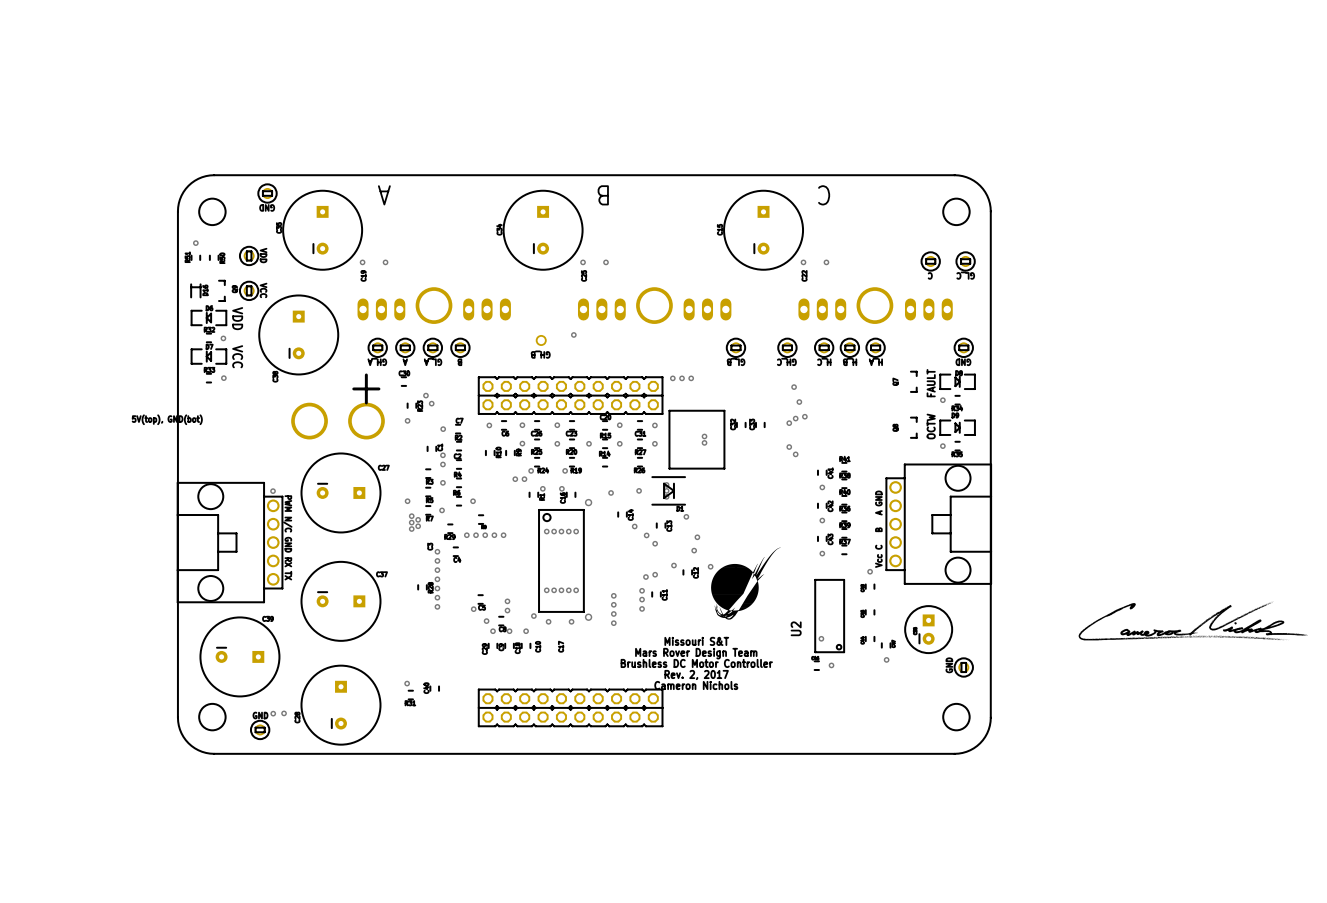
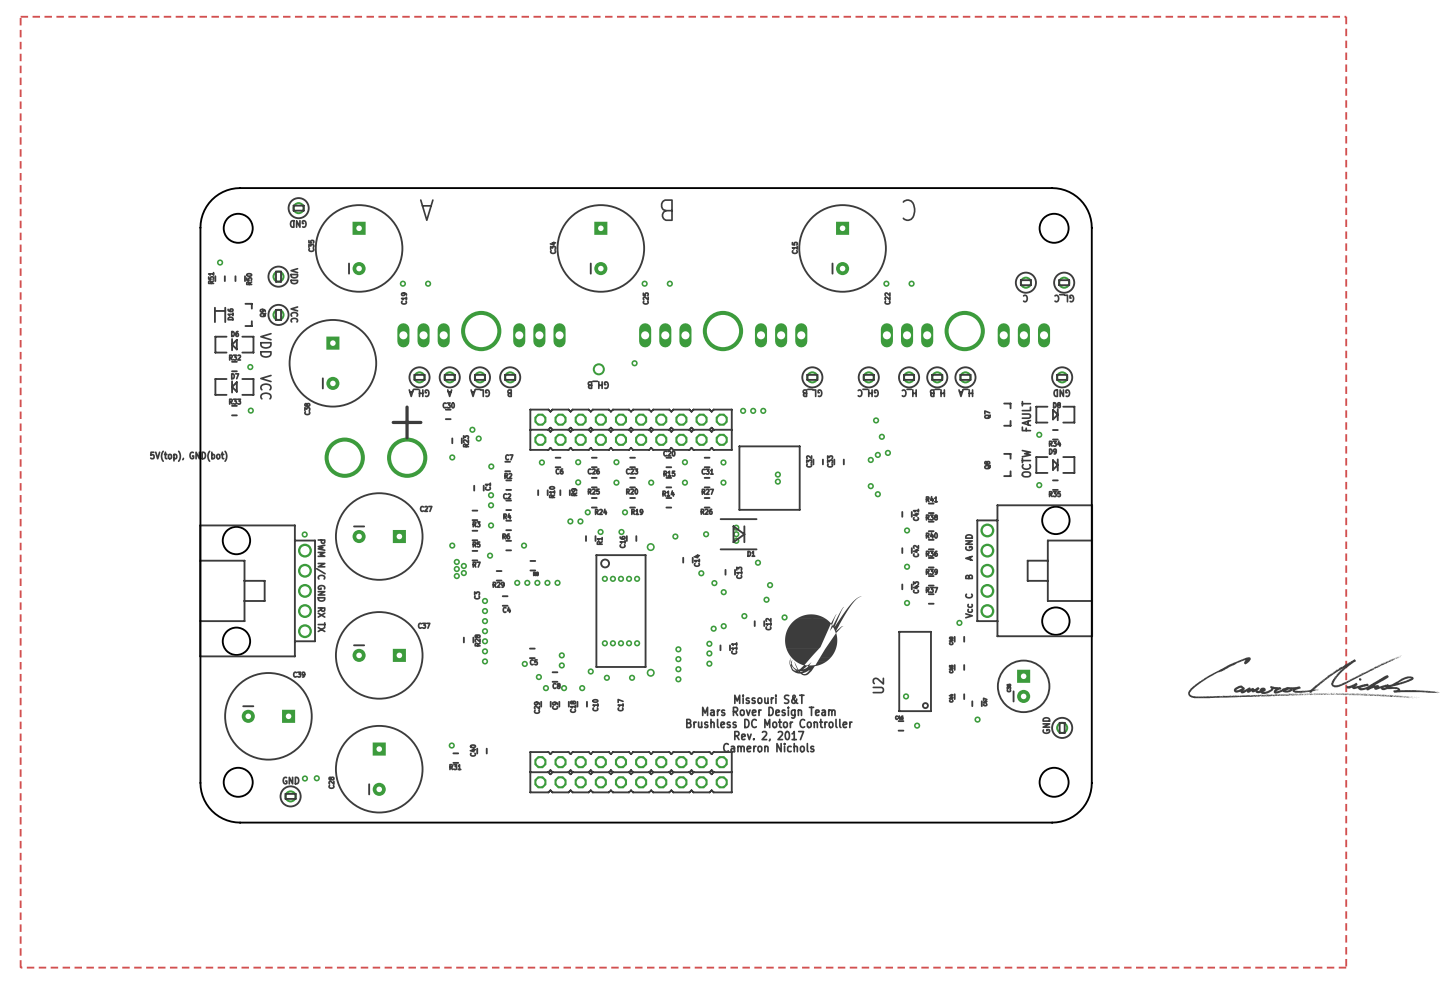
zone outline: none -> (20, 16) (1346, 16) (1346, 967) (20, 967) (20, 16)

